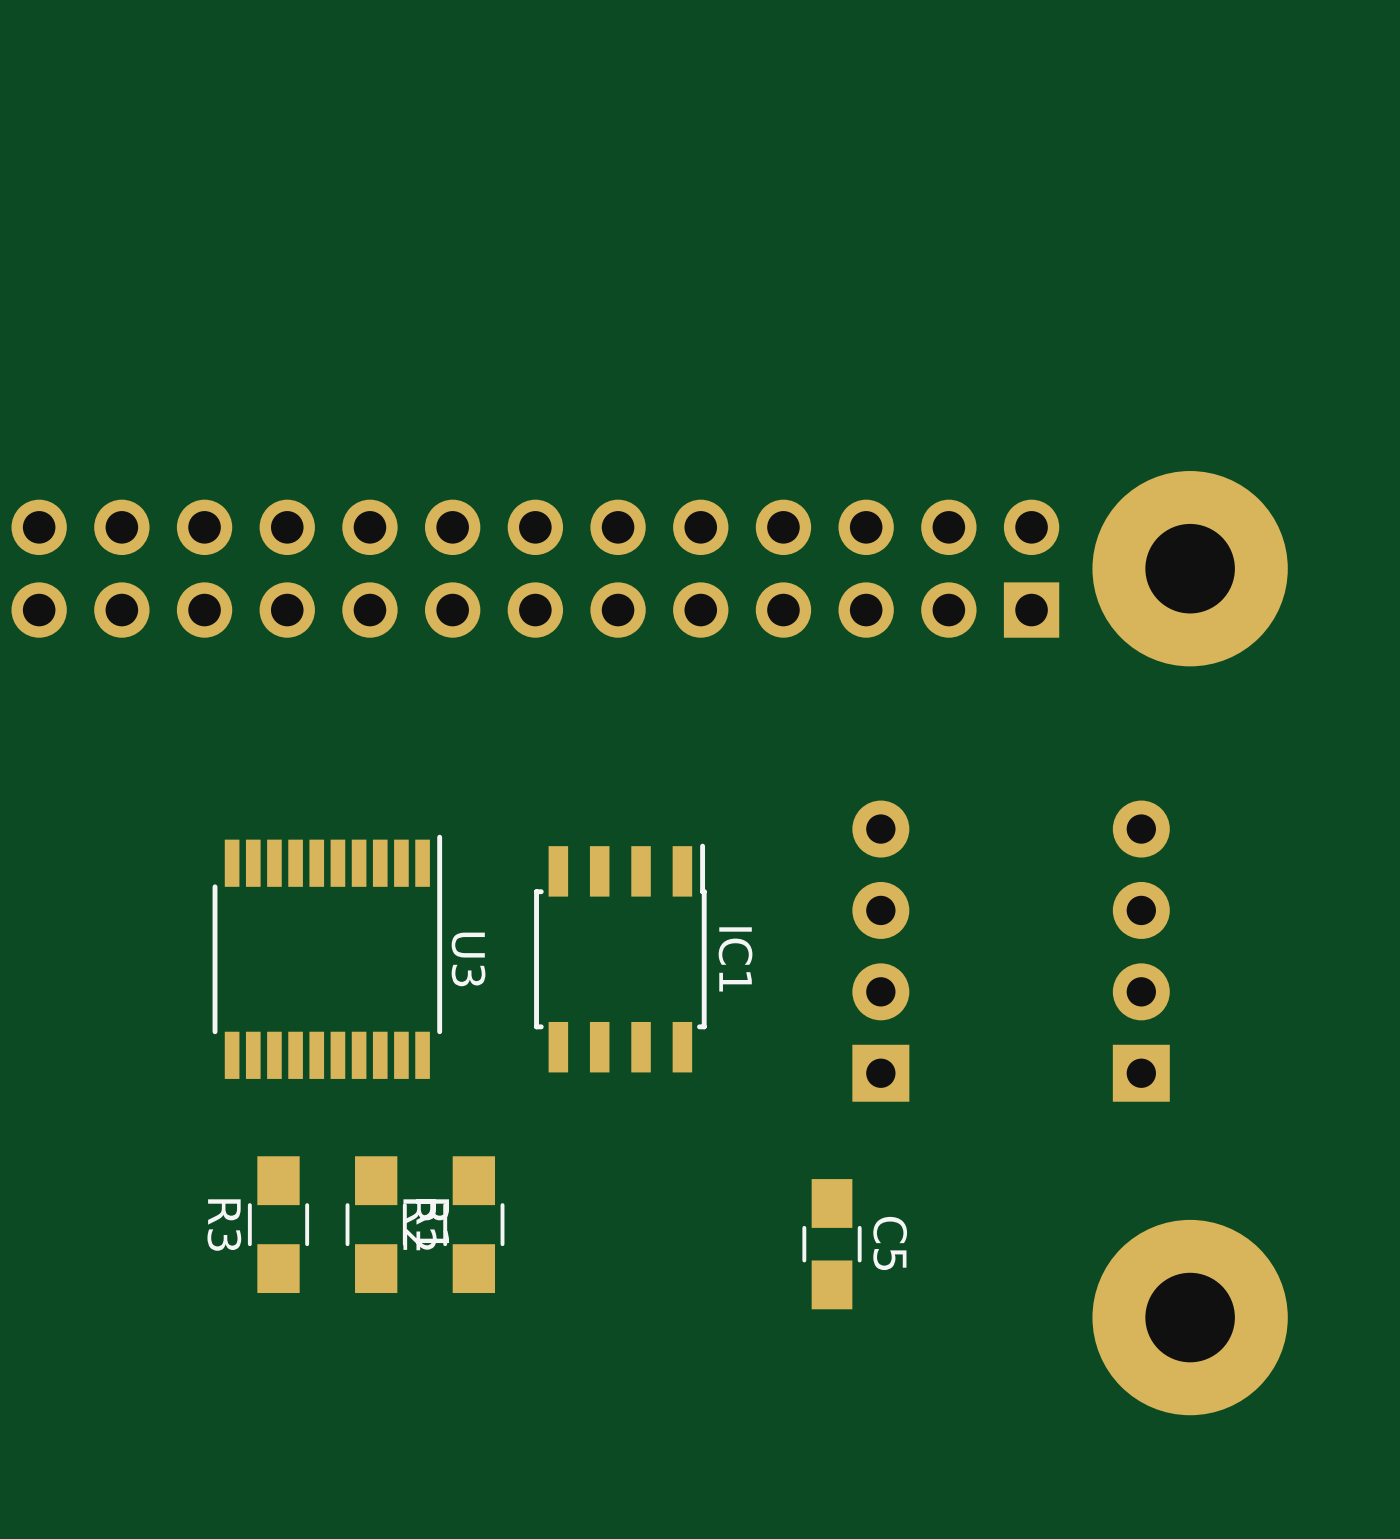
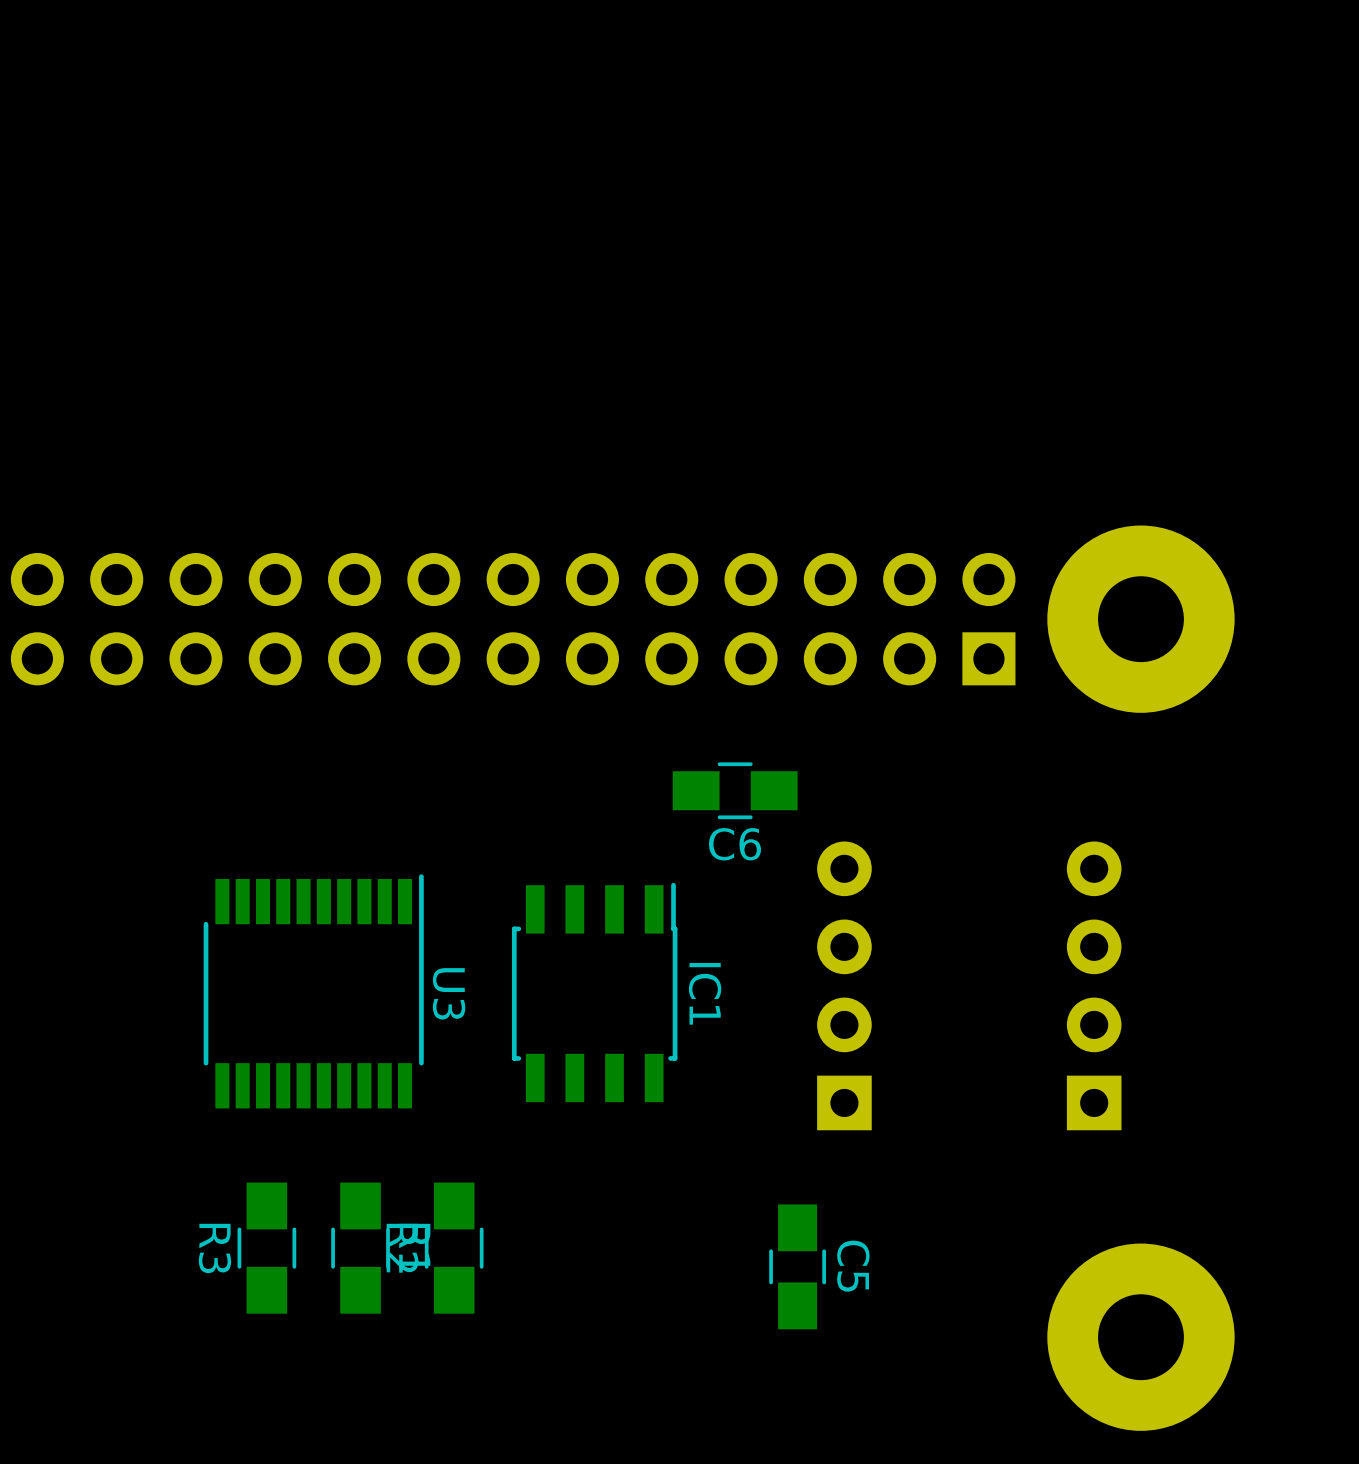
C6: none -> (735, 790)

